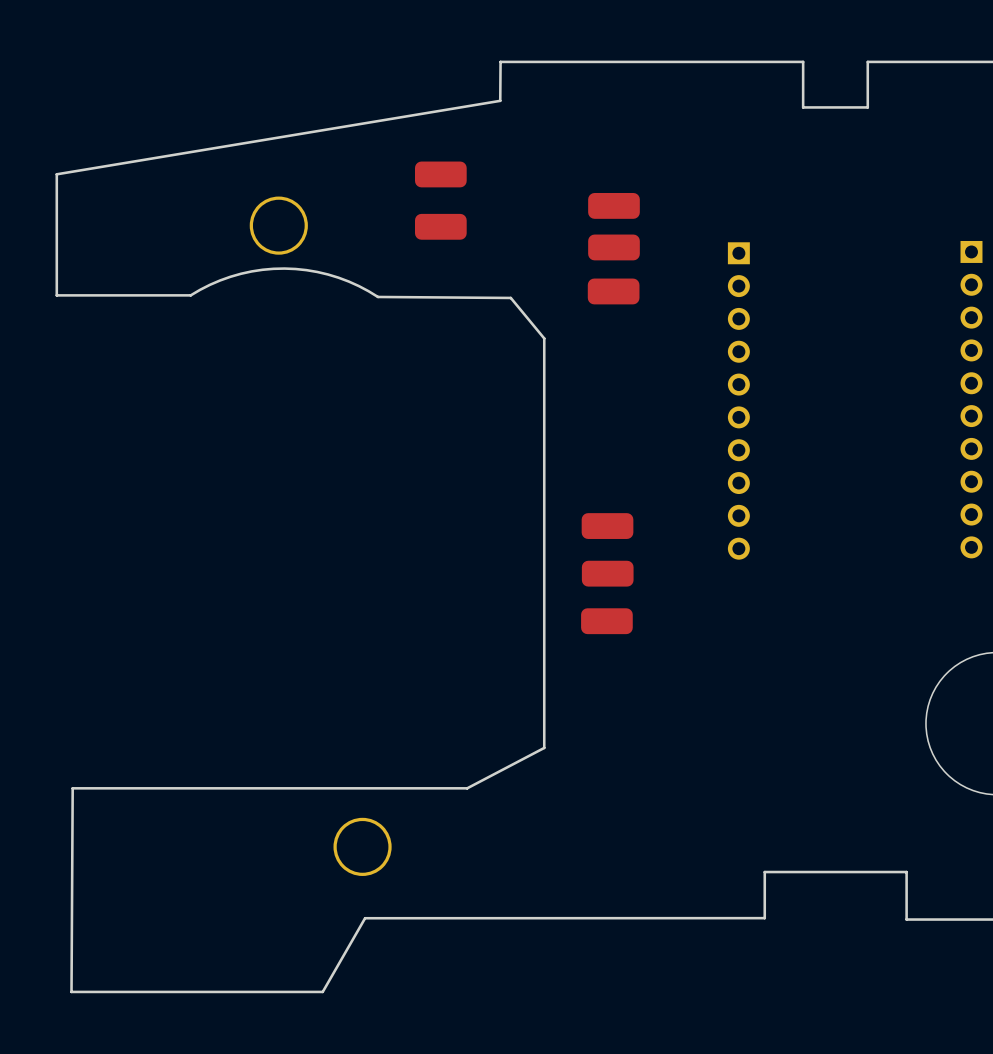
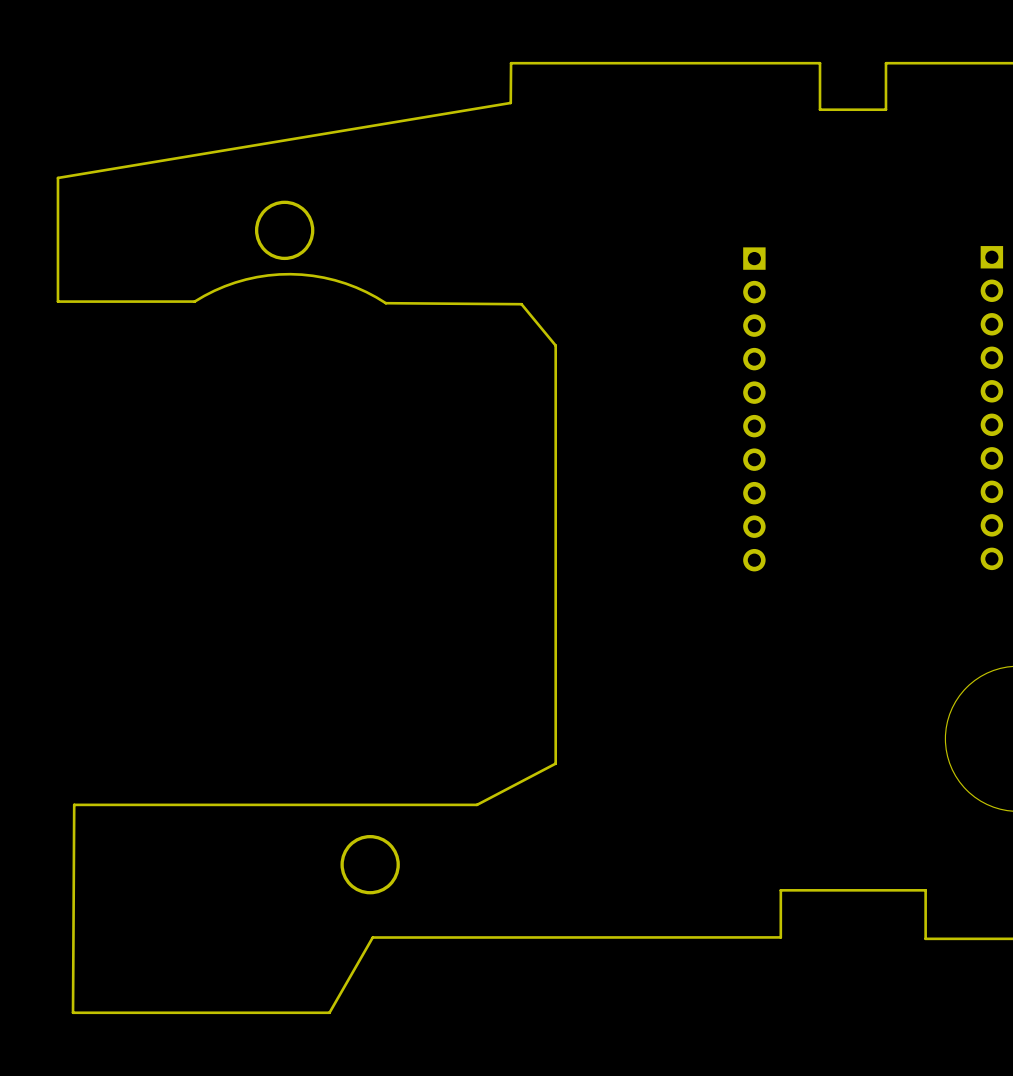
part: (440, 174) -> none
part: (613, 205) -> none
part: (440, 226) -> none
part: (613, 247) -> none
part: (613, 291) -> none
part: (607, 526) -> none
part: (607, 573) -> none
part: (606, 621) -> none

